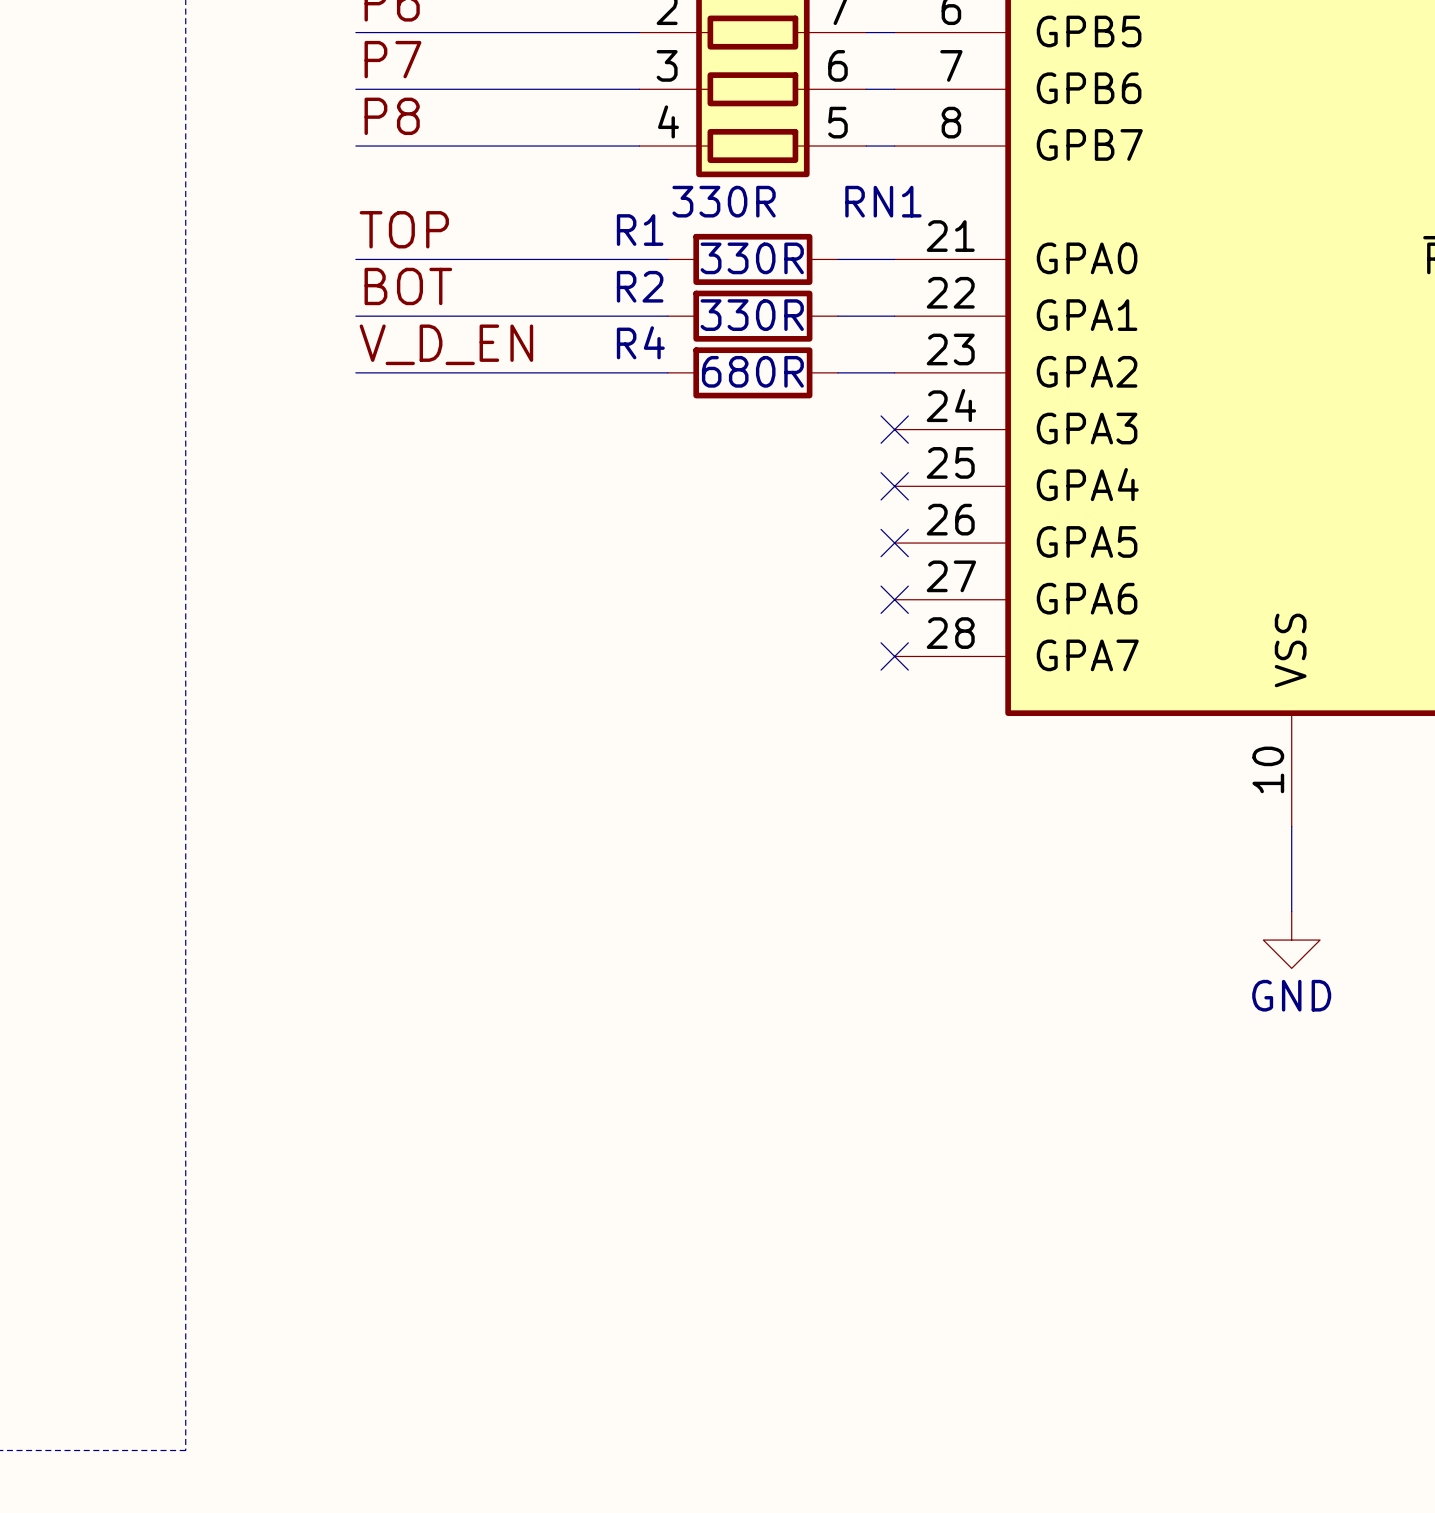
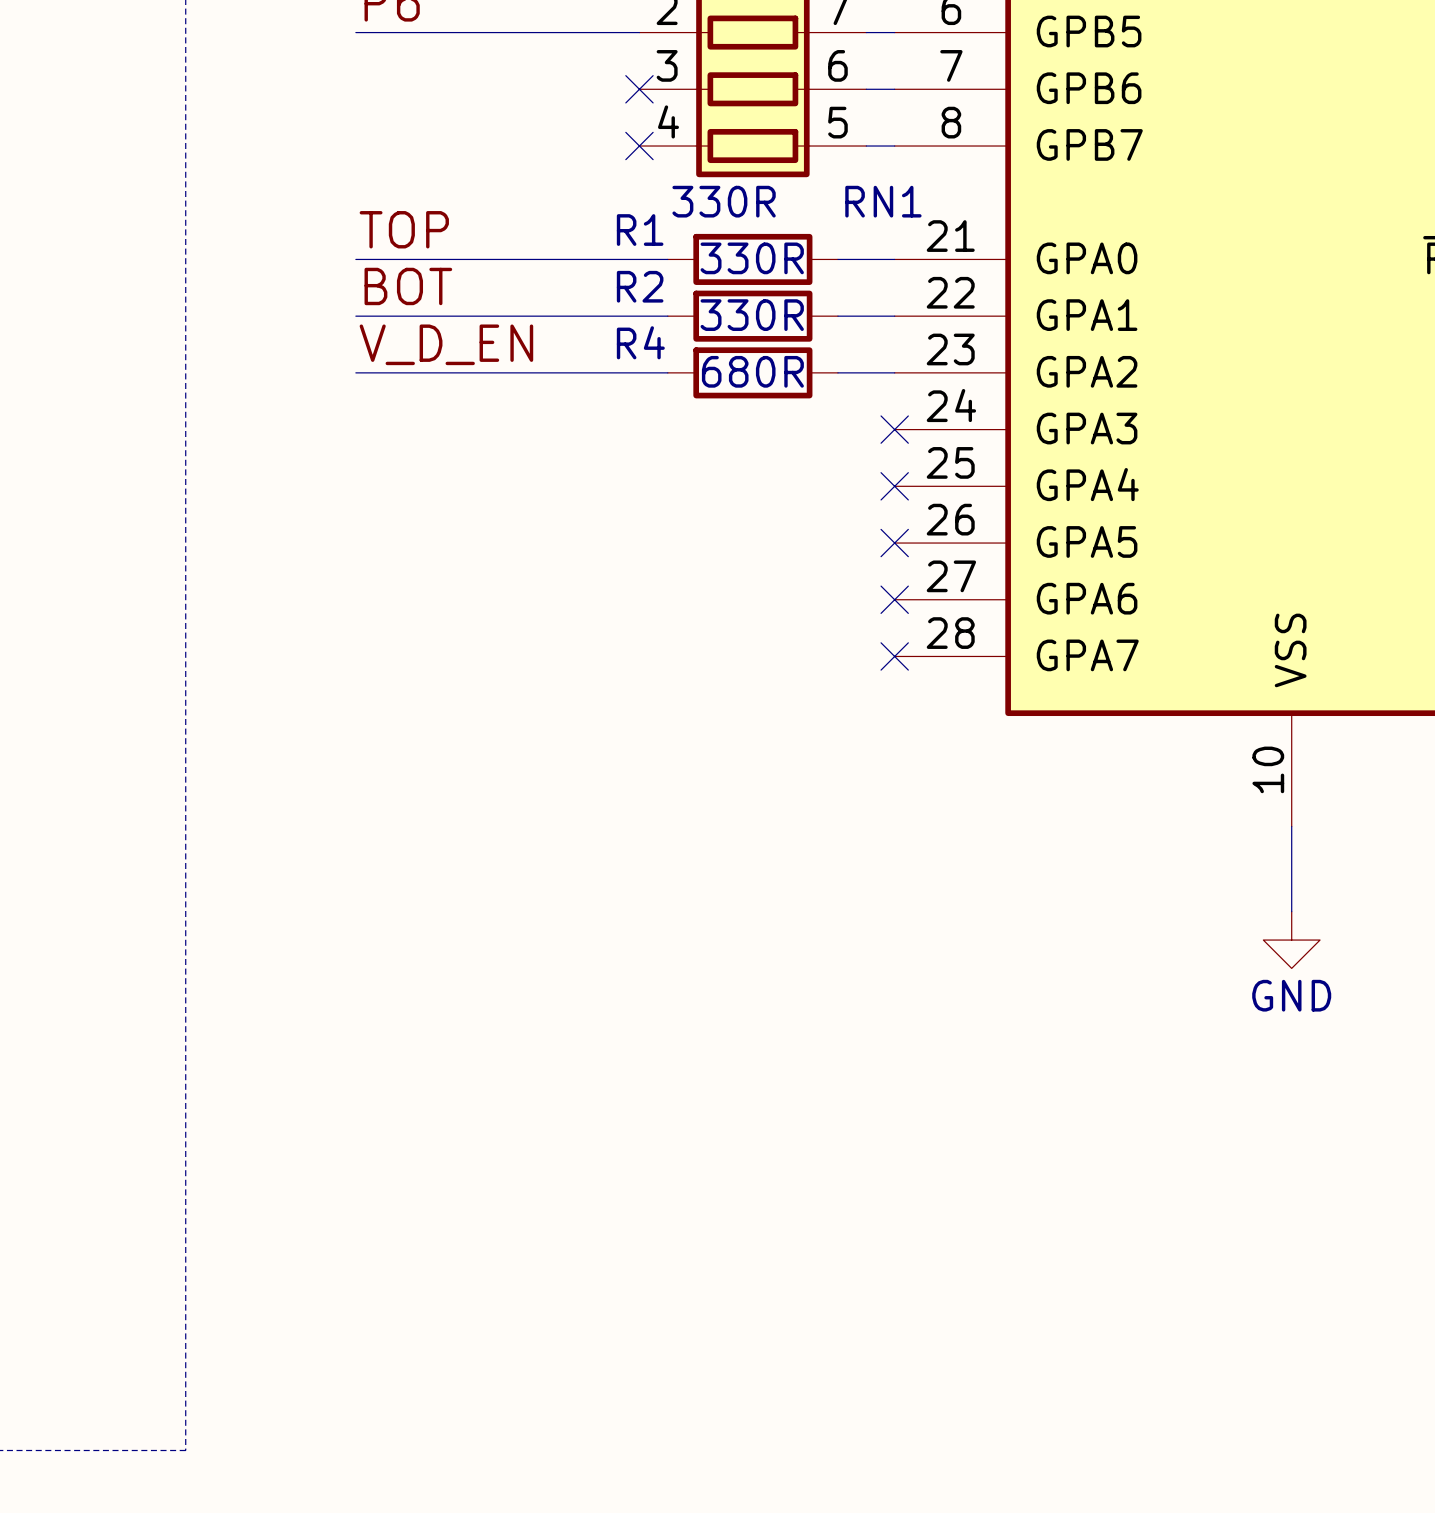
label: P7 (392, 59) -> none
wire: (355, 89) (639, 89) -> none
no-connect mark: none -> (639, 89)
label: P8 (392, 116) -> none
wire: (355, 146) (639, 146) -> none
no-connect mark: none -> (639, 146)

